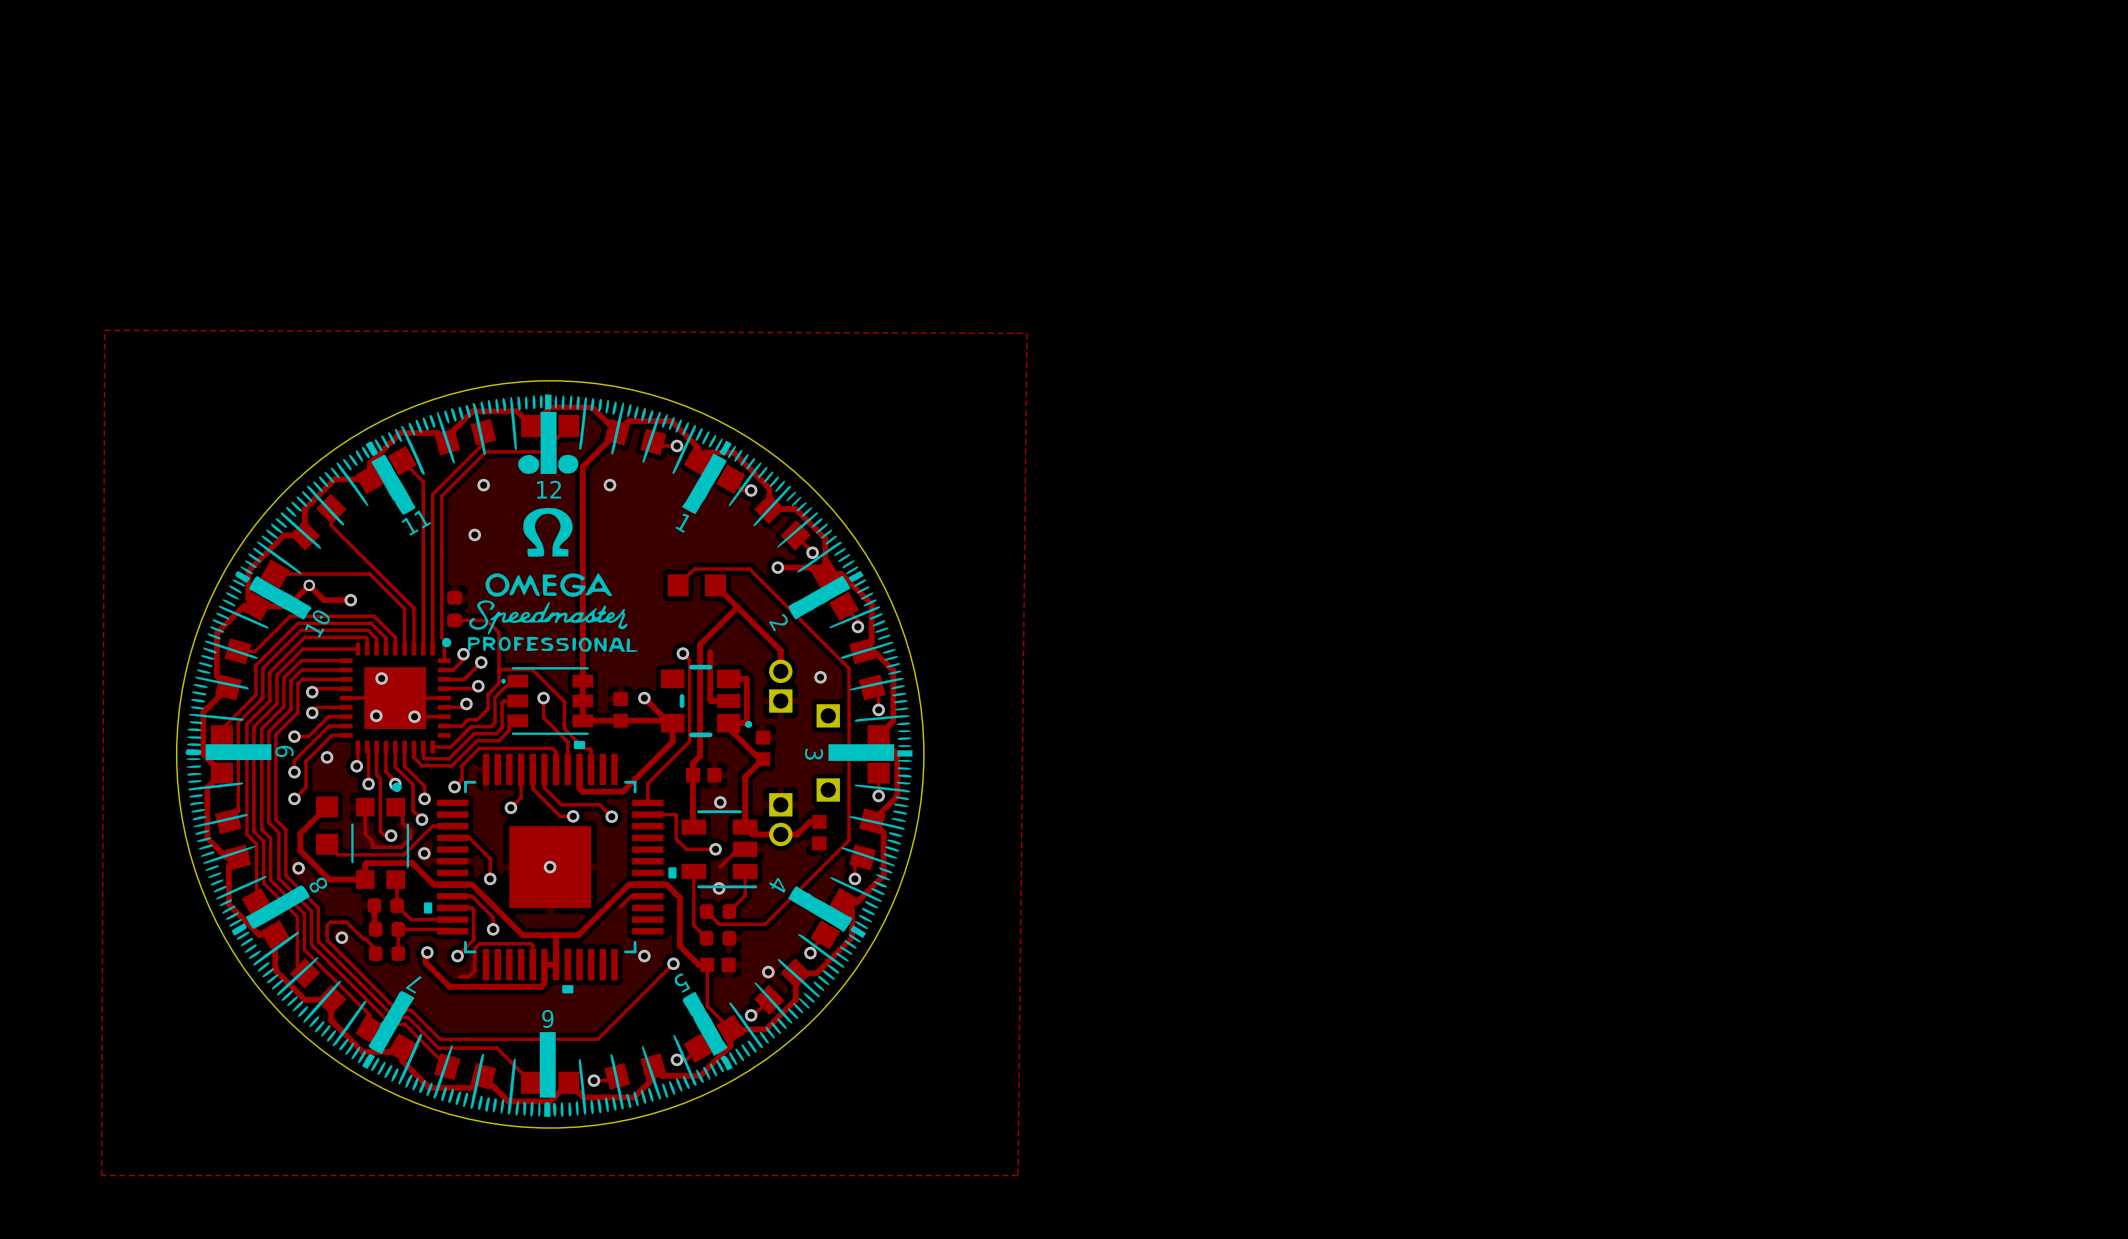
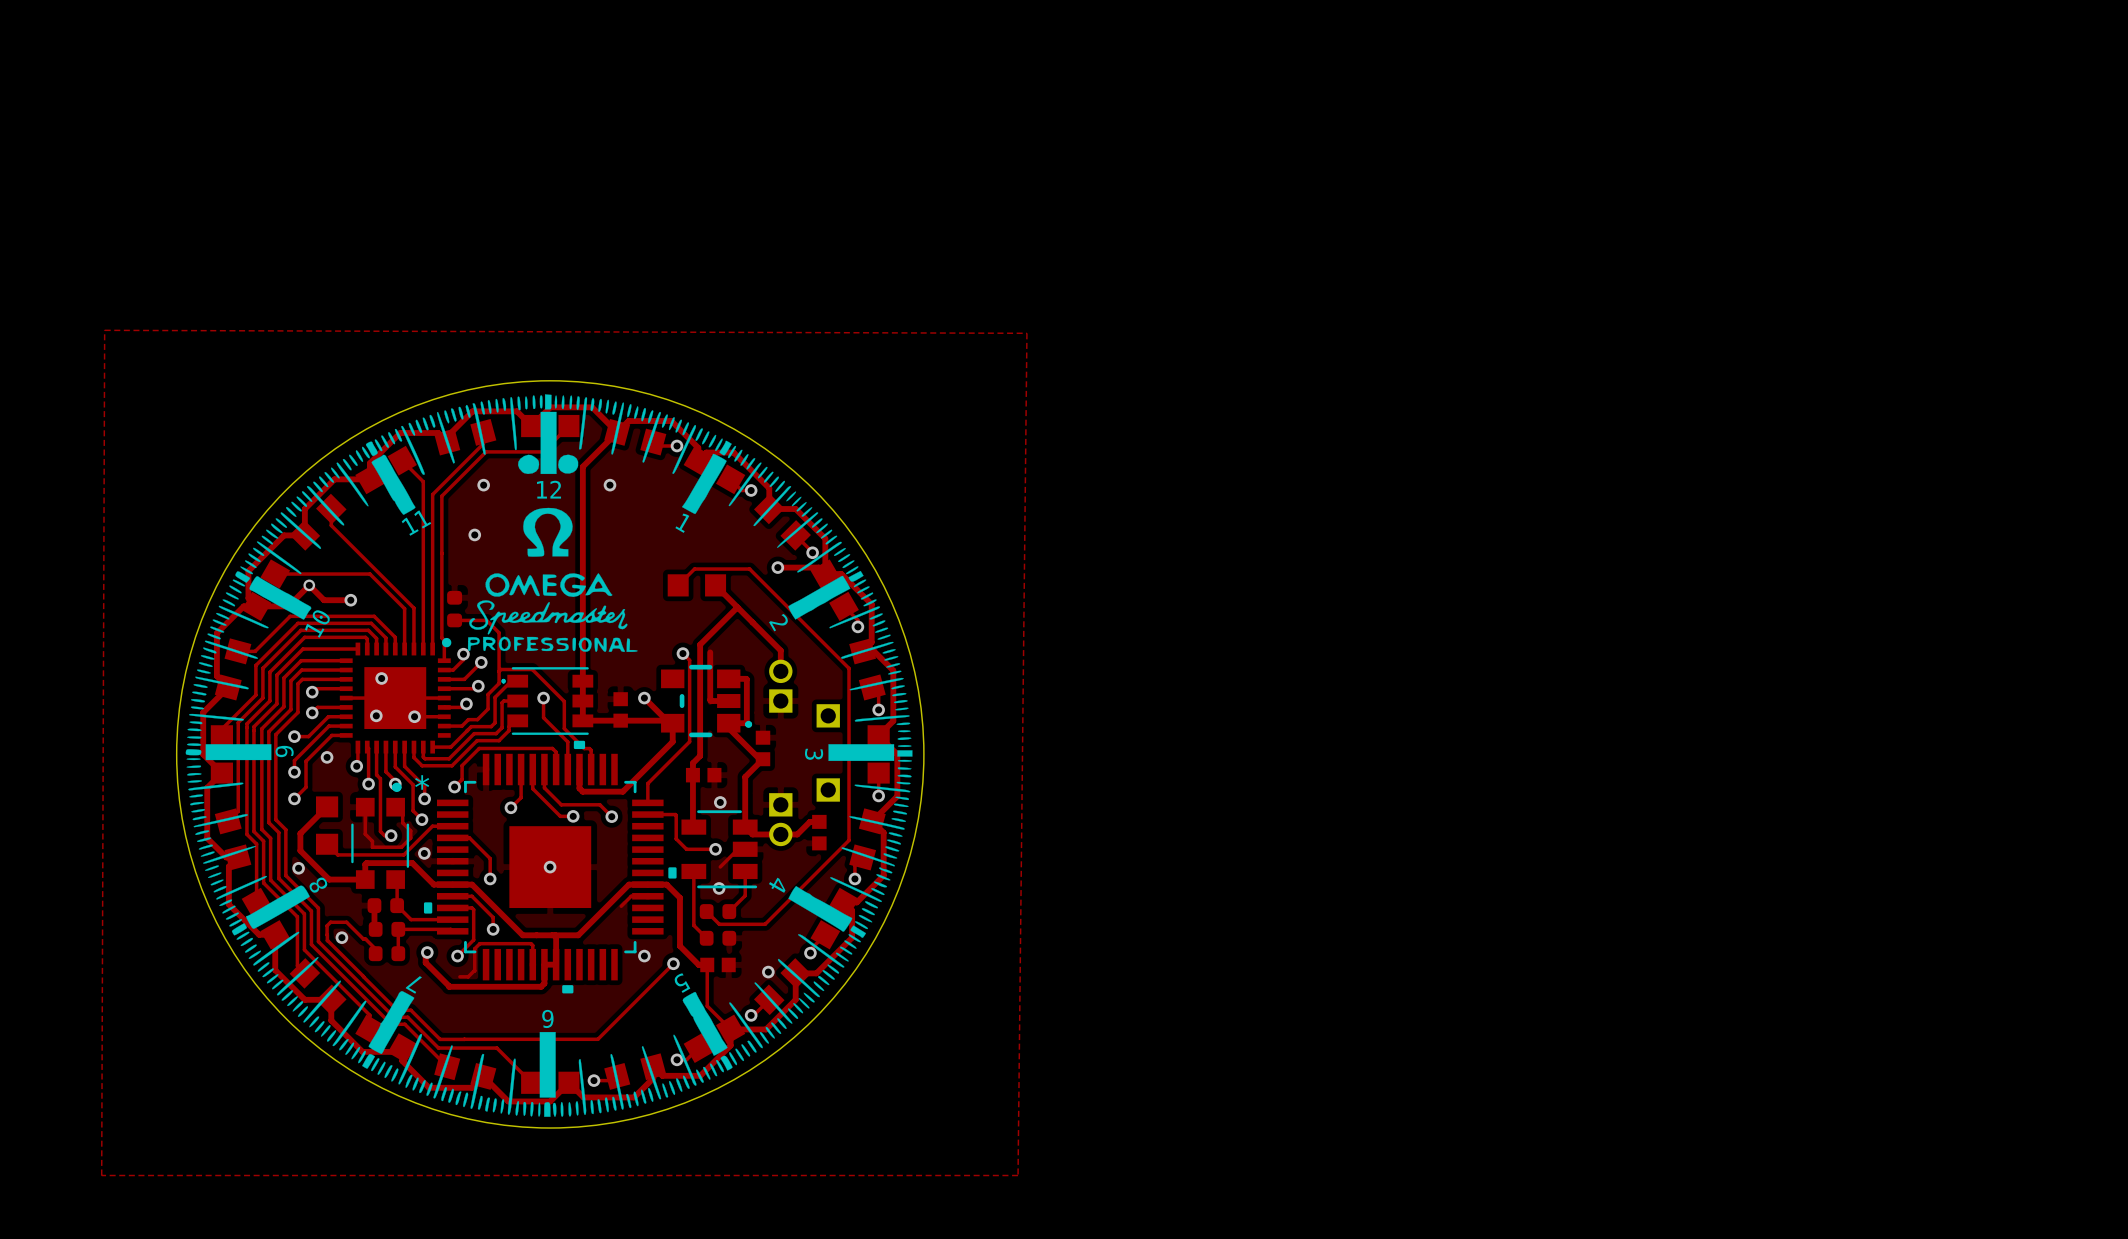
via: (820, 677) -> none
part text: none -> * (422, 782)

